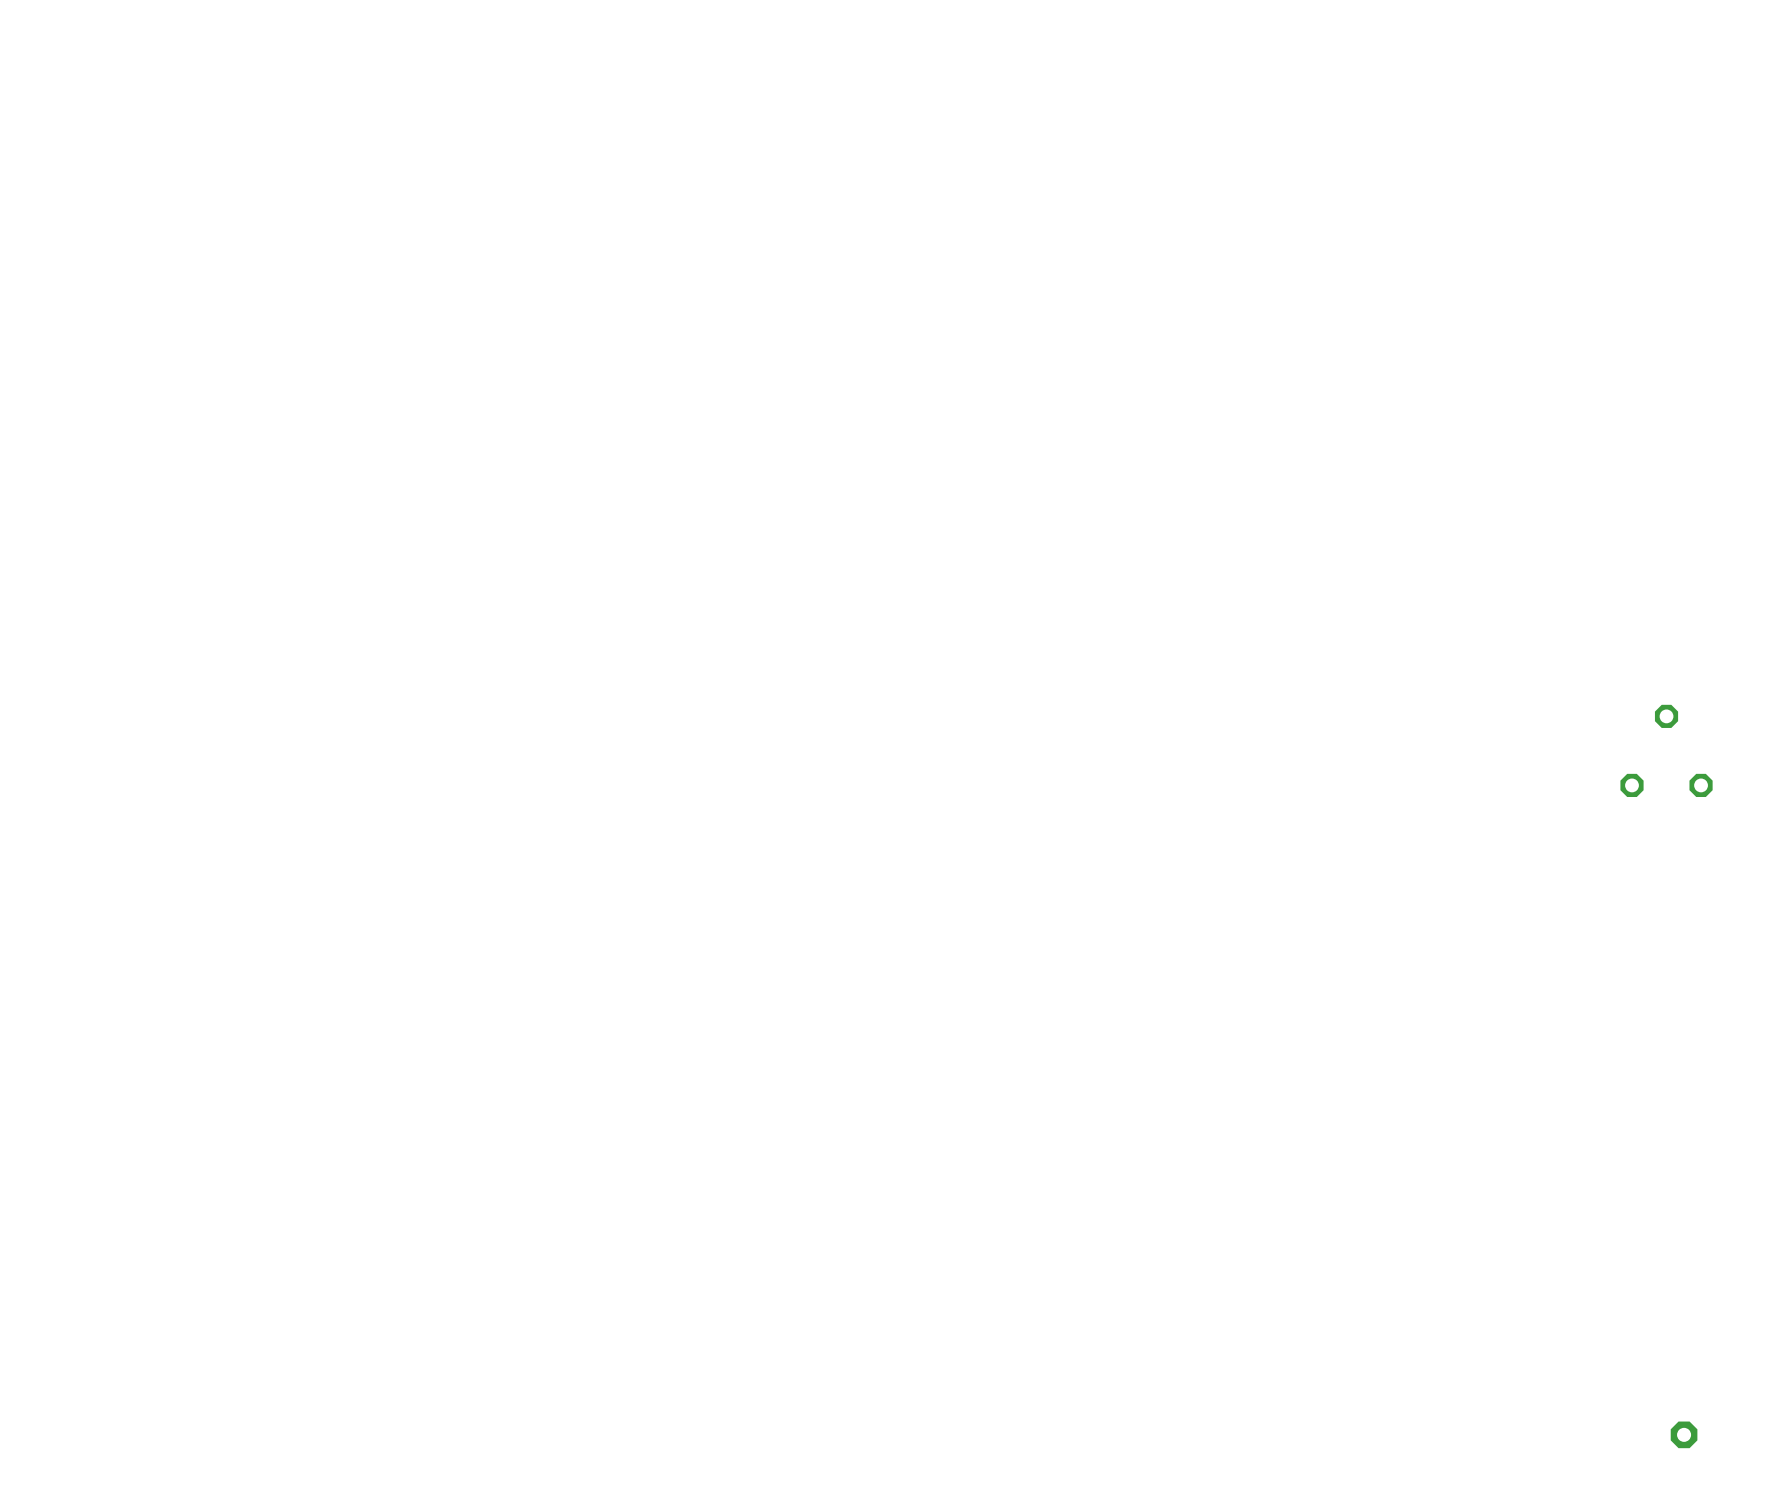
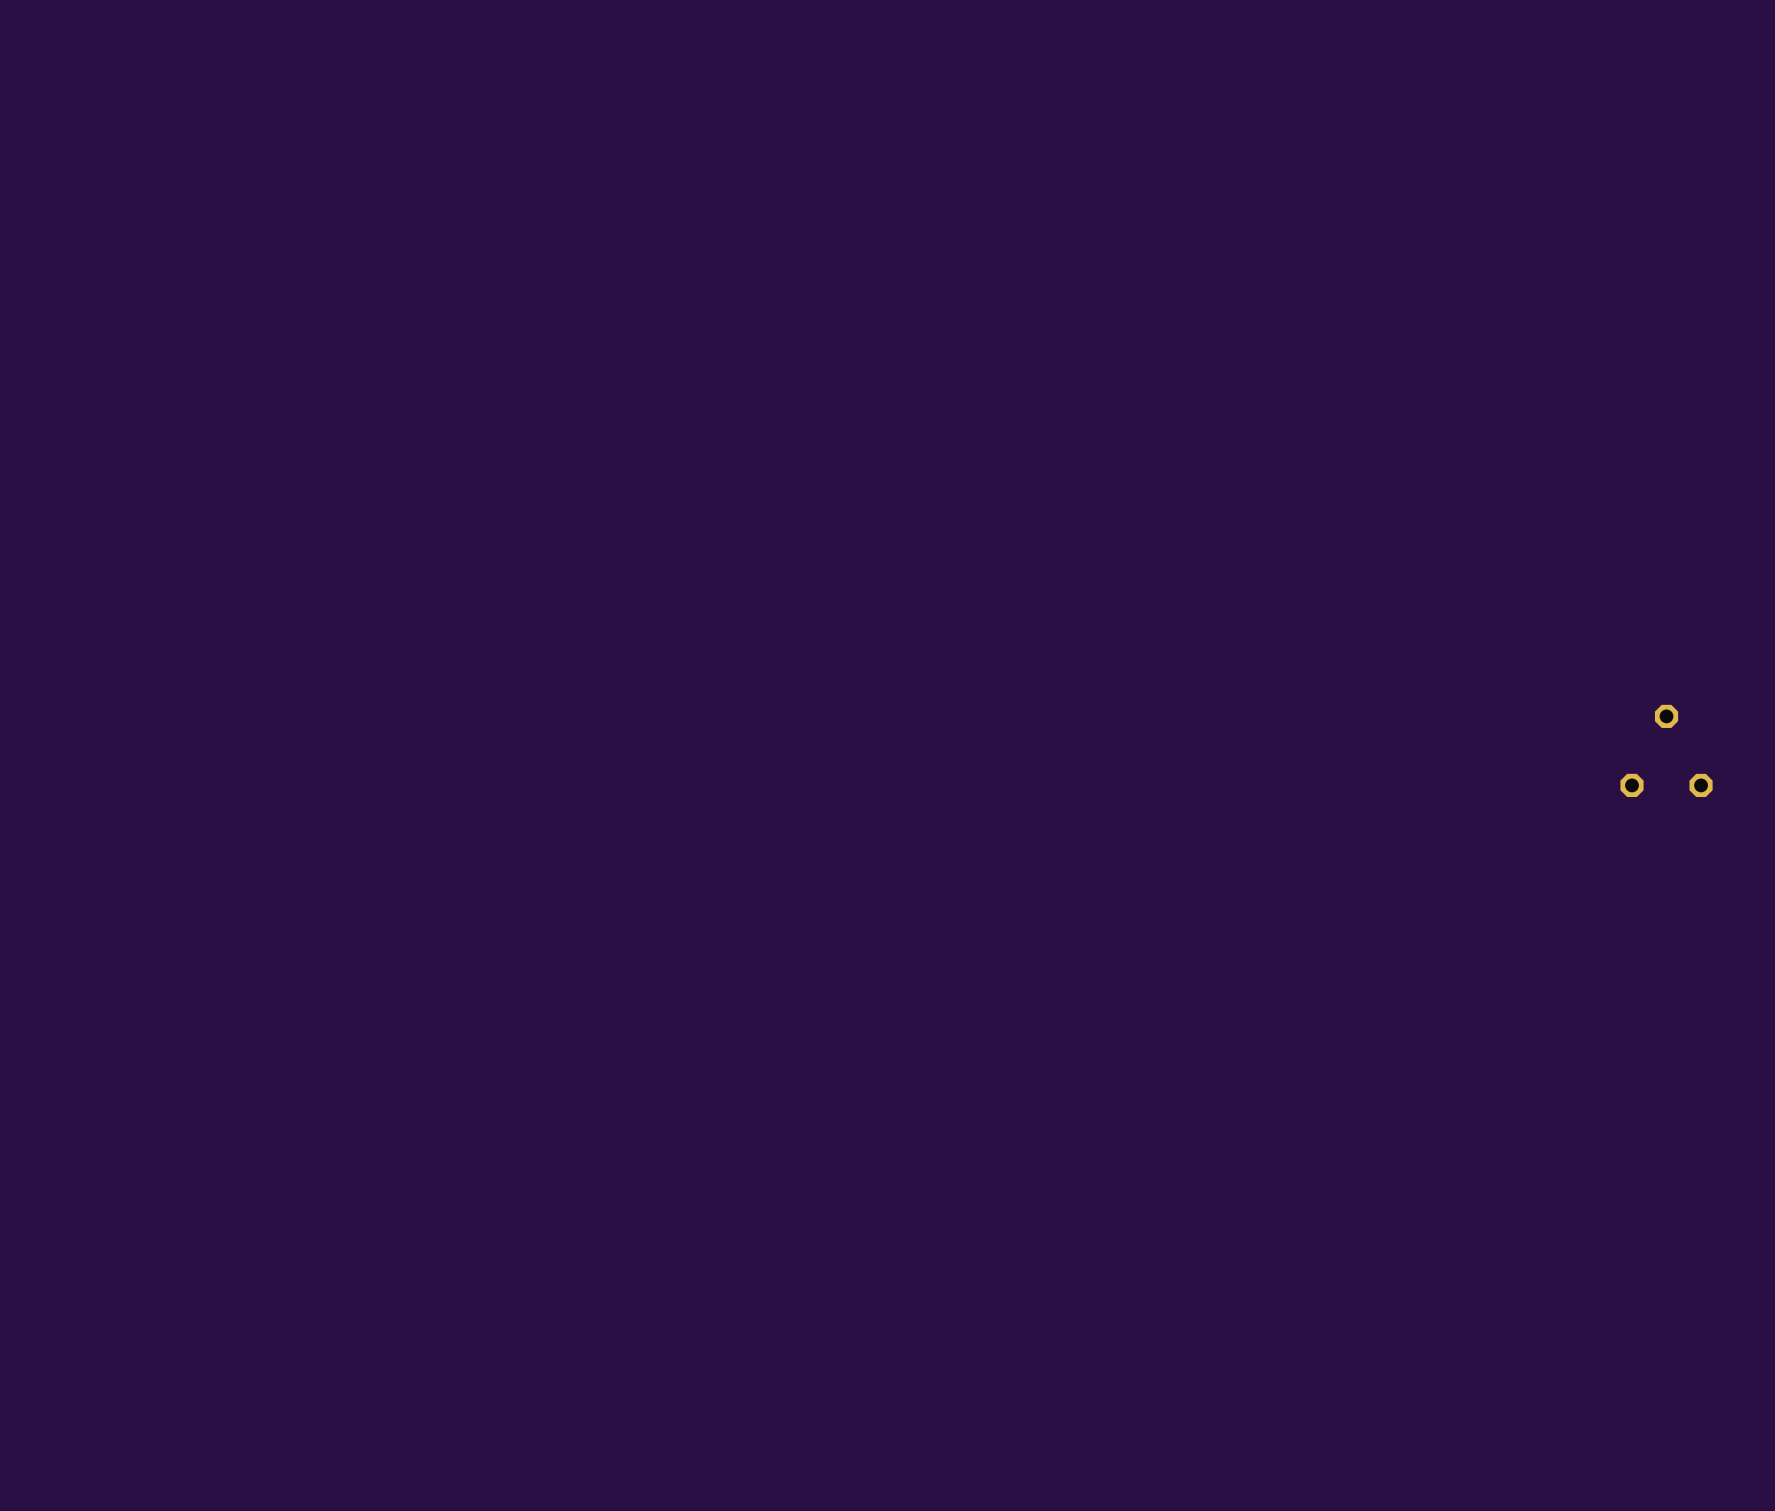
part: (1684, 1434) -> none

